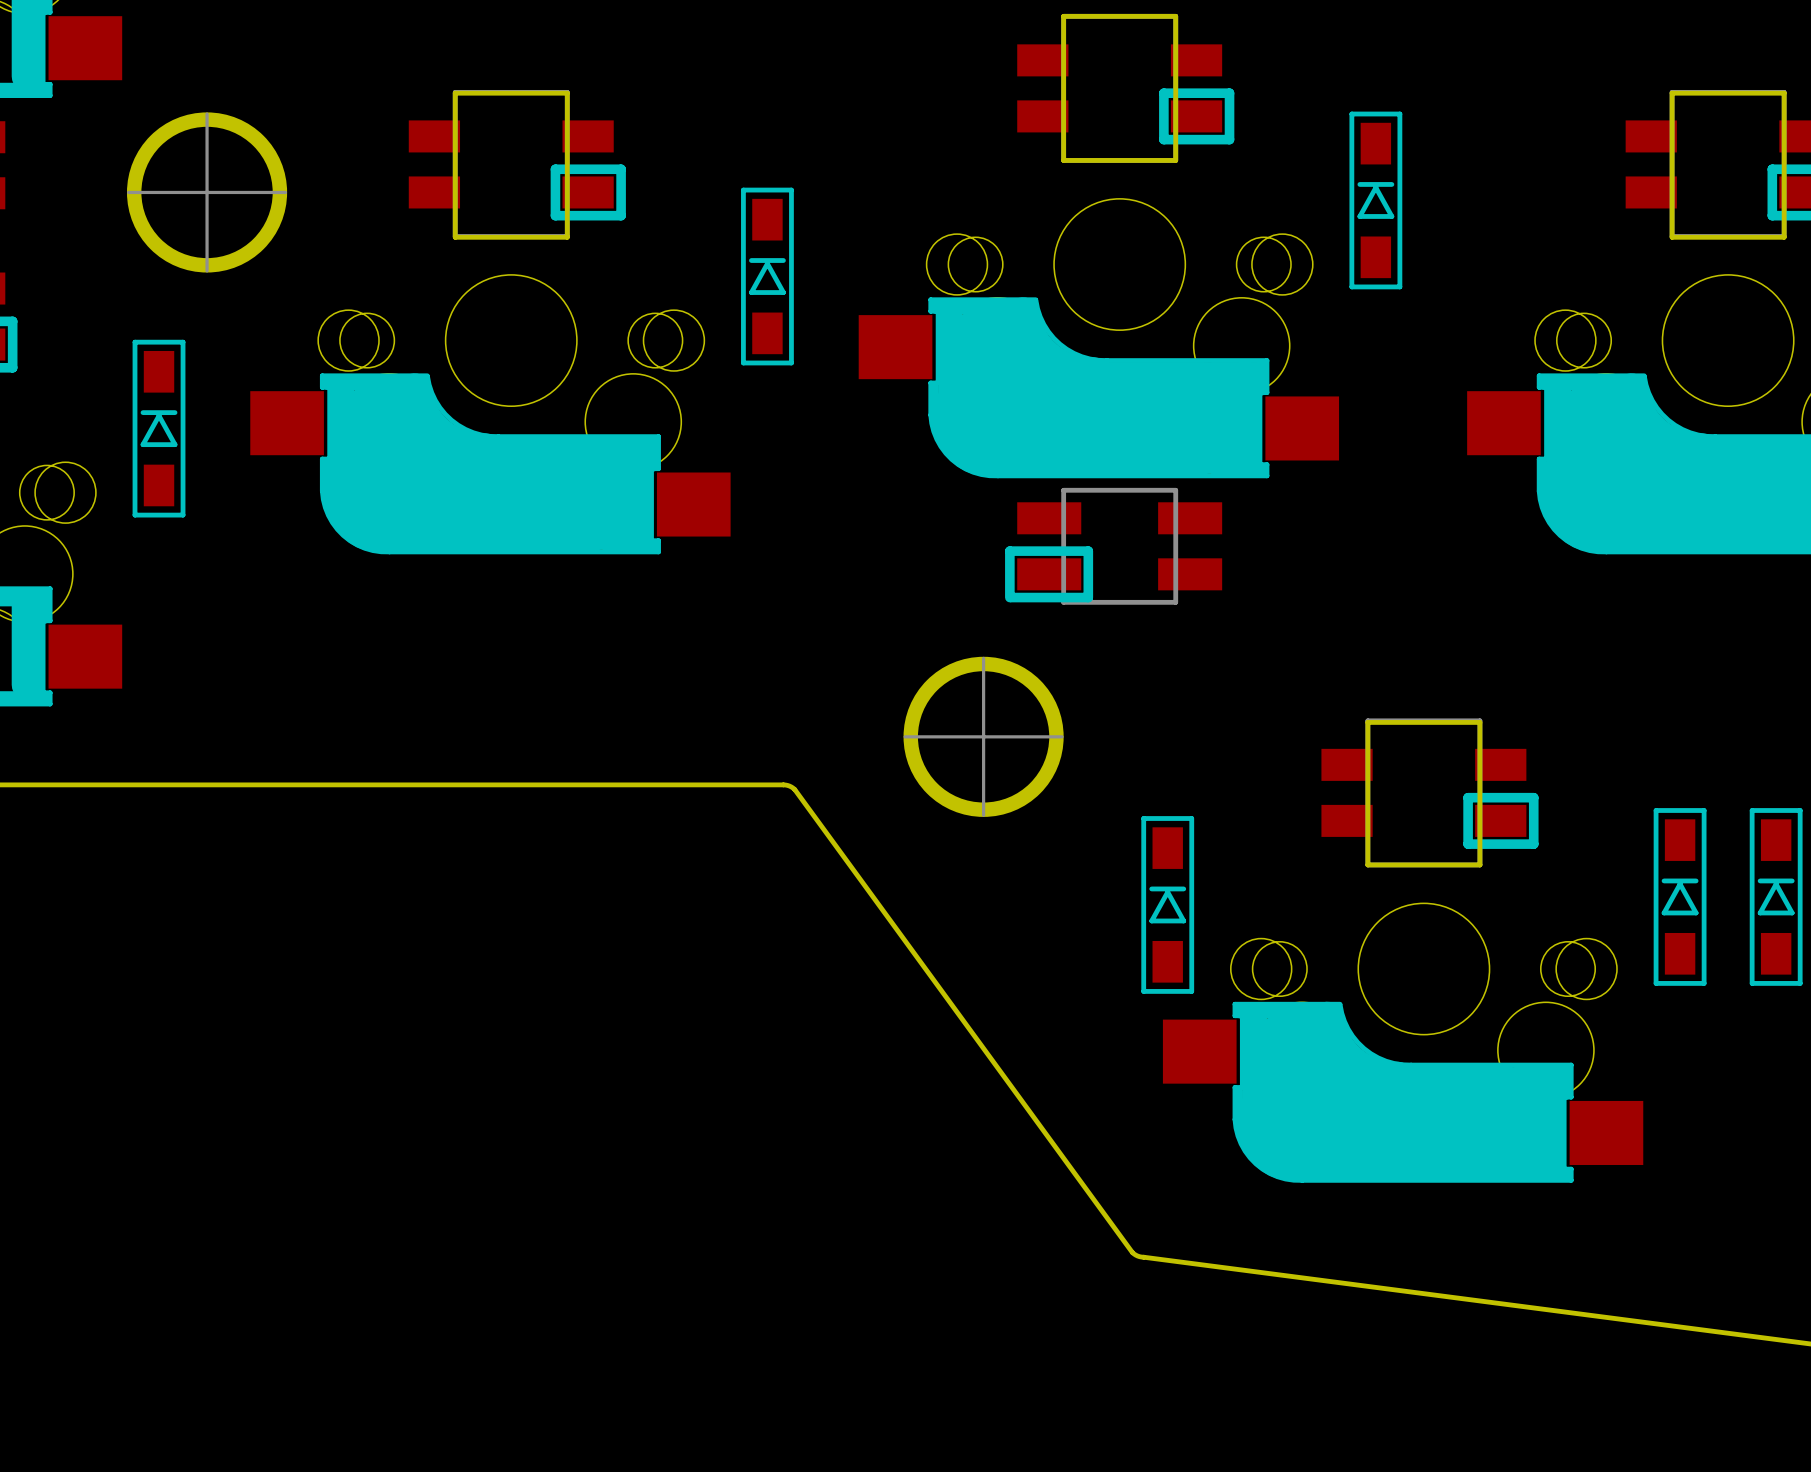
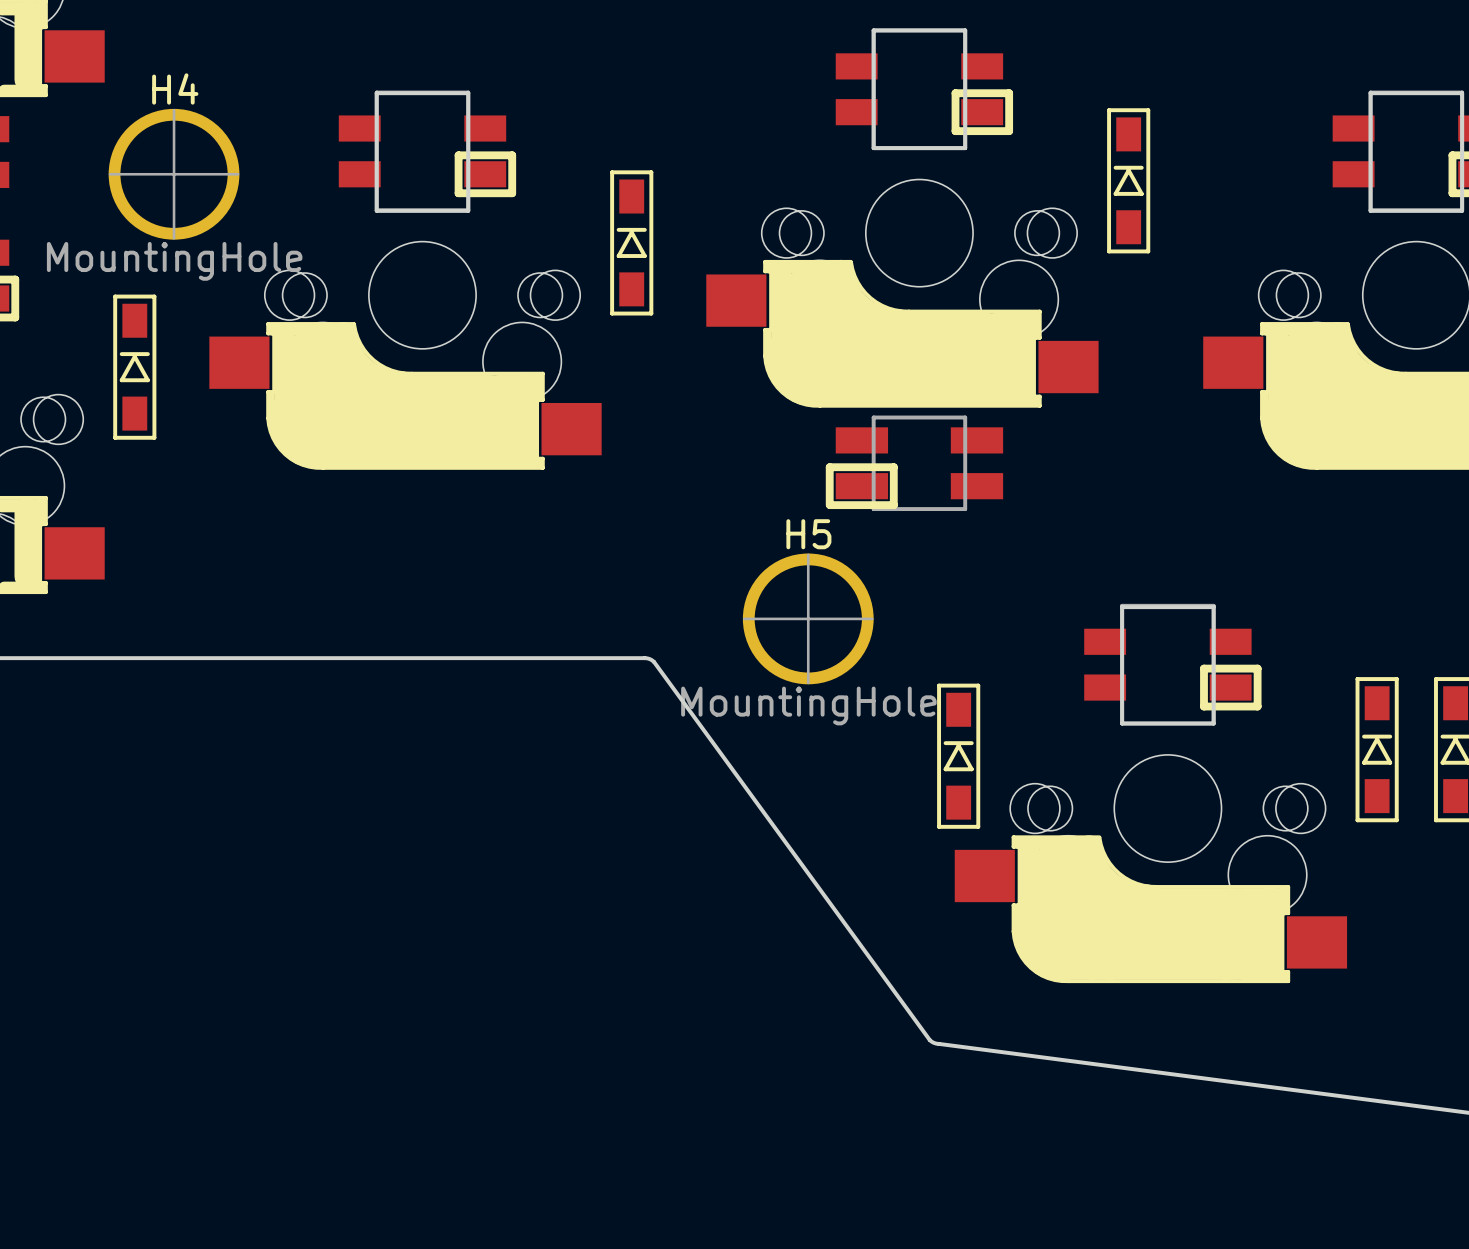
H4 name: none -> H4 (175, 88)
H4 value: none -> MountingHole (174, 261)
H5 name: none -> H5 (808, 534)
H5 value: none -> MountingHole (808, 705)

